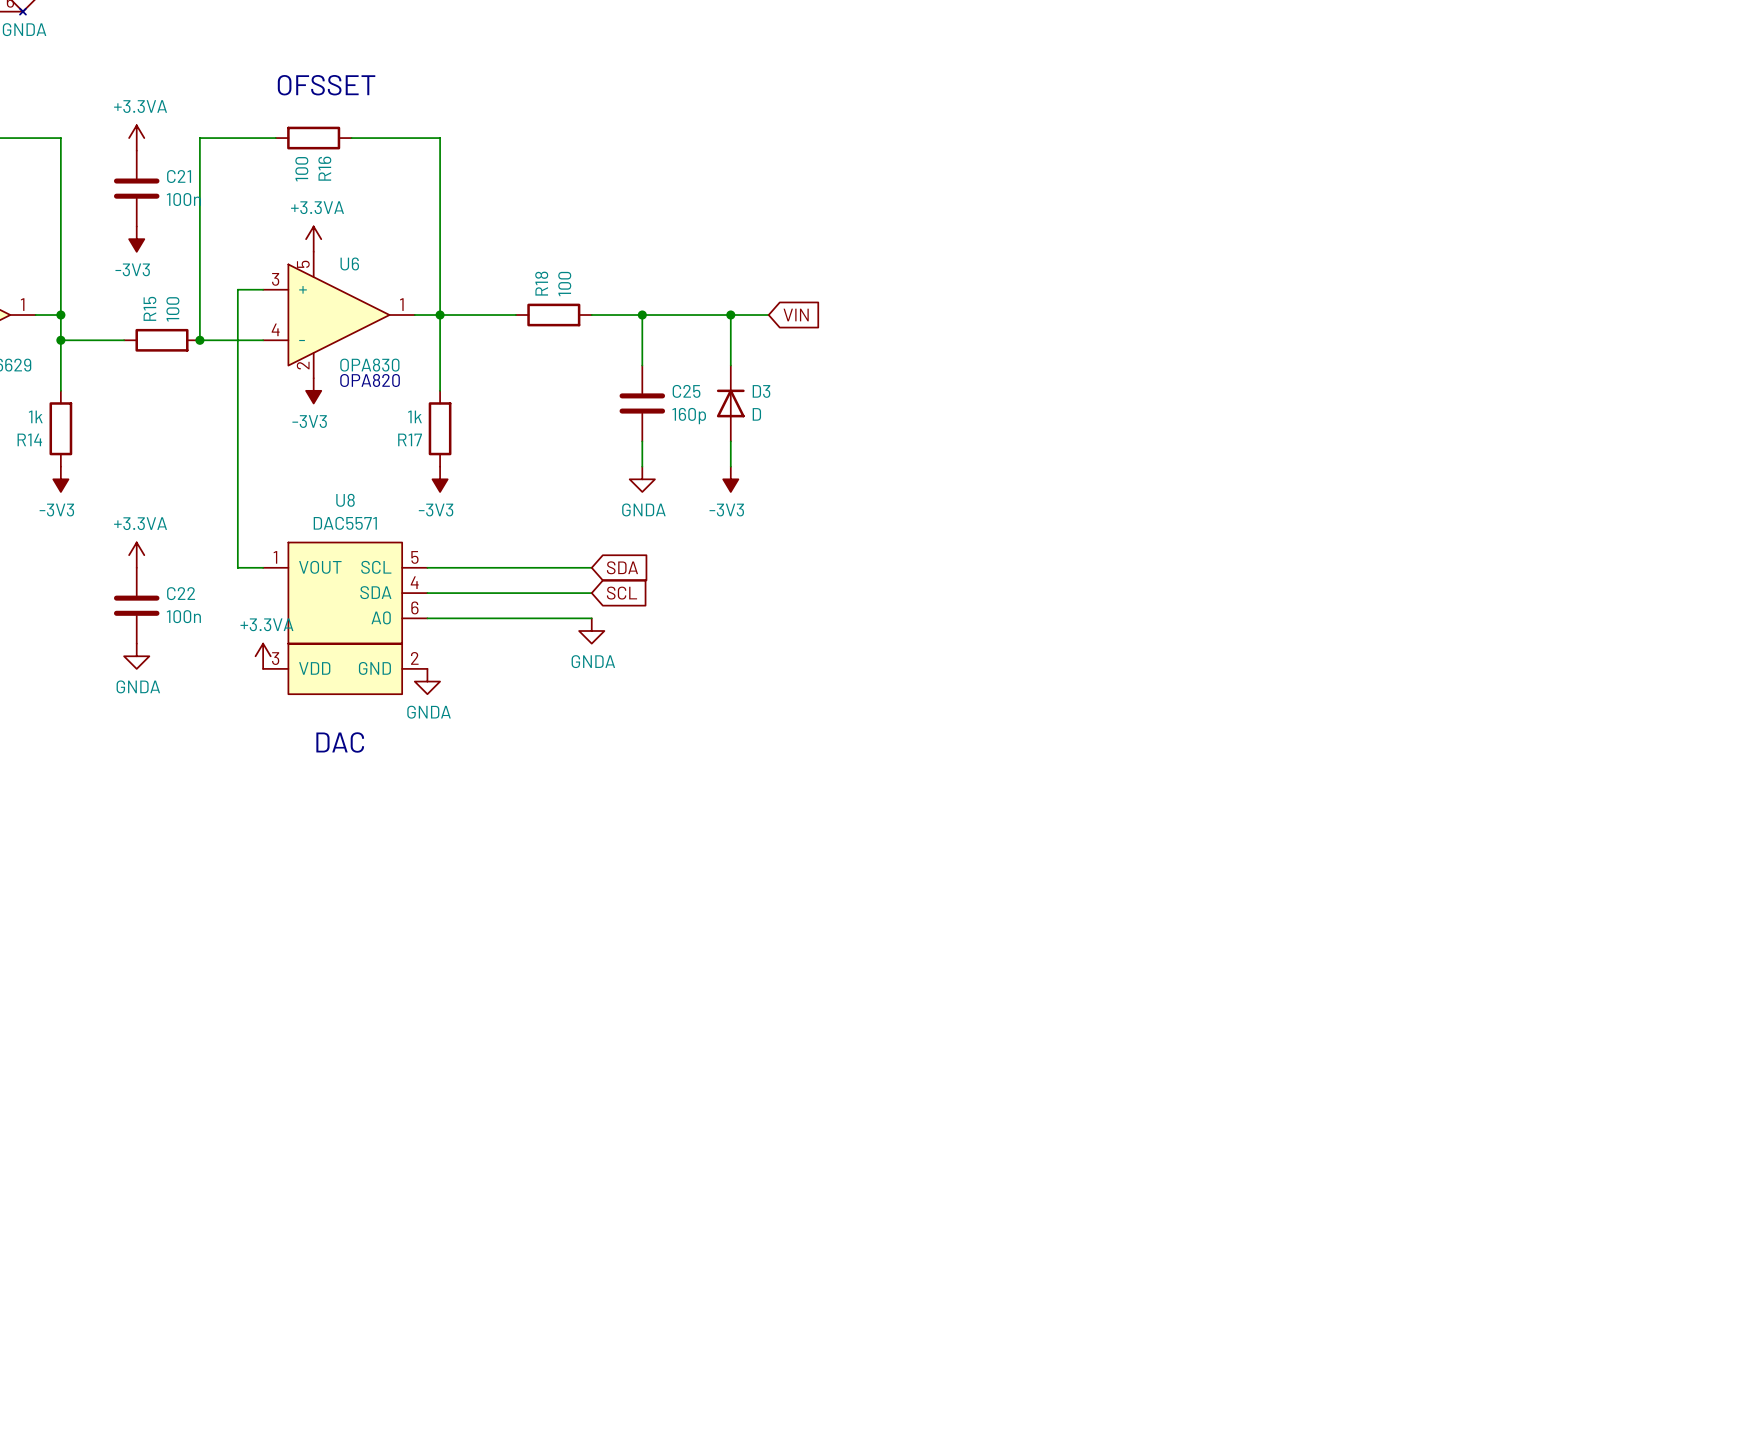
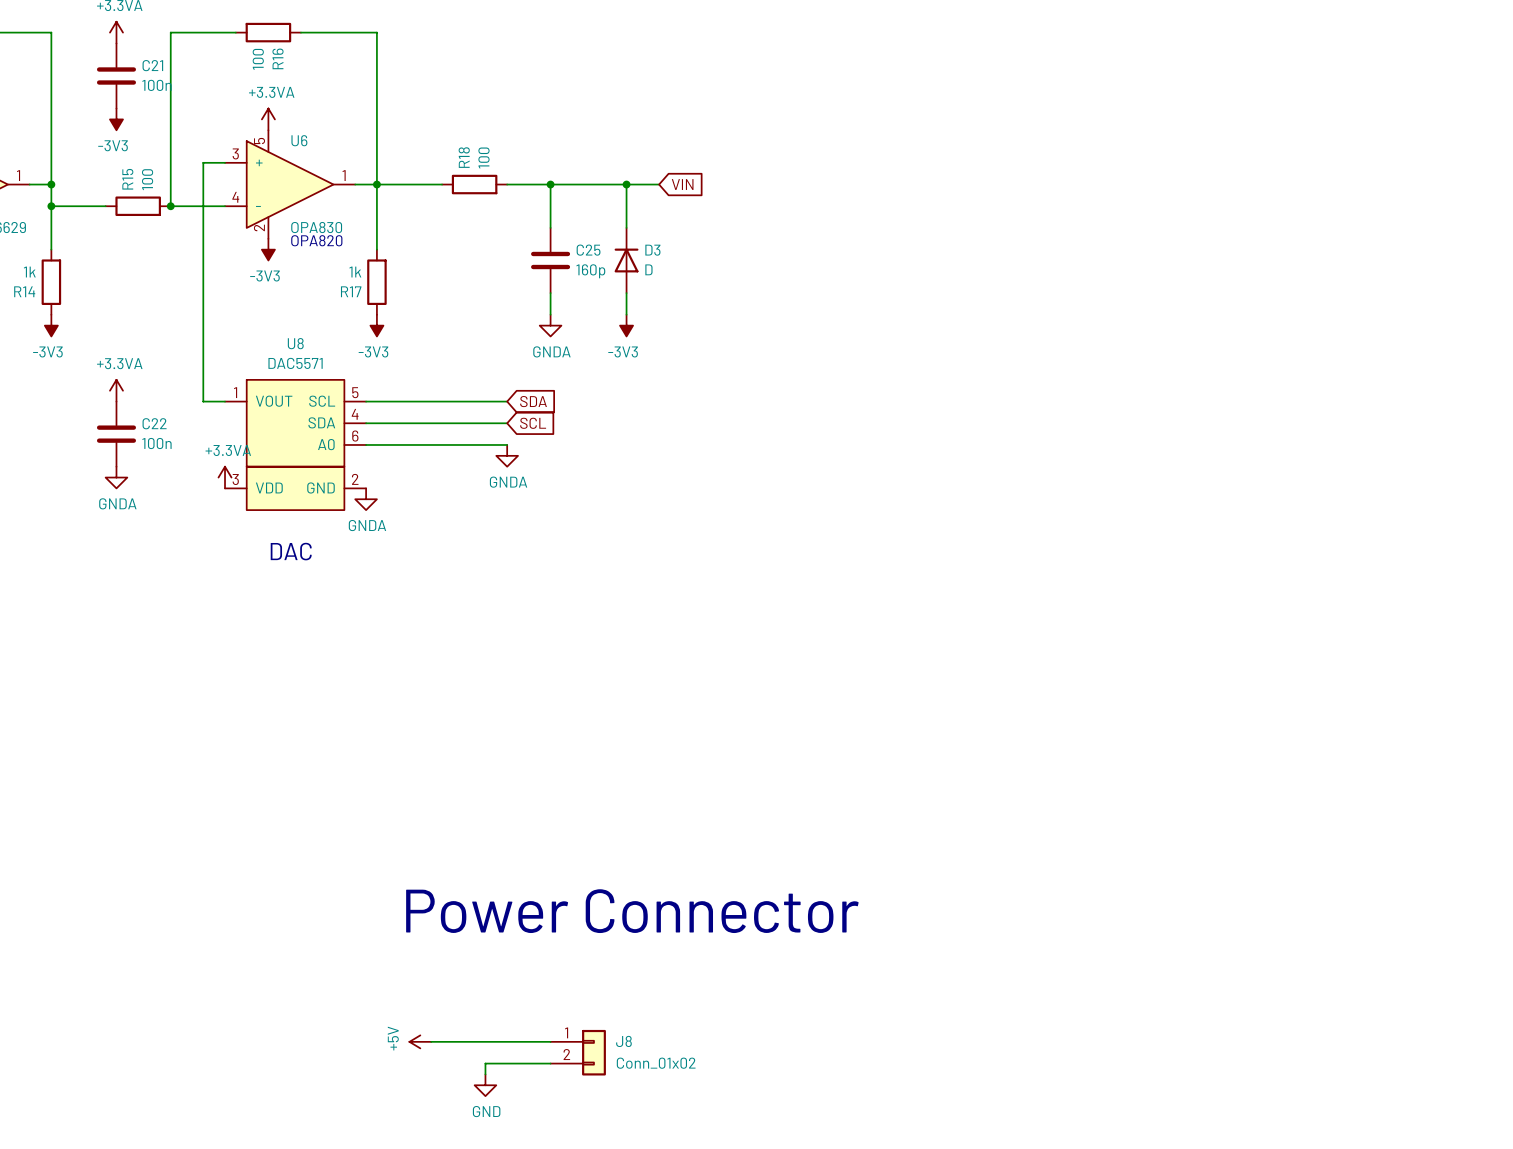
text: none -> Power Connector (632, 911)
power symbol: none -> +5V (420, 1041)
wire: none -> (431, 1041) (550, 1041)
J8: none -> Conn_01x02 (578, 1052)
wire: none -> (550, 1063) (485, 1063) (485, 1074)
power symbol: none -> GND (485, 1085)

